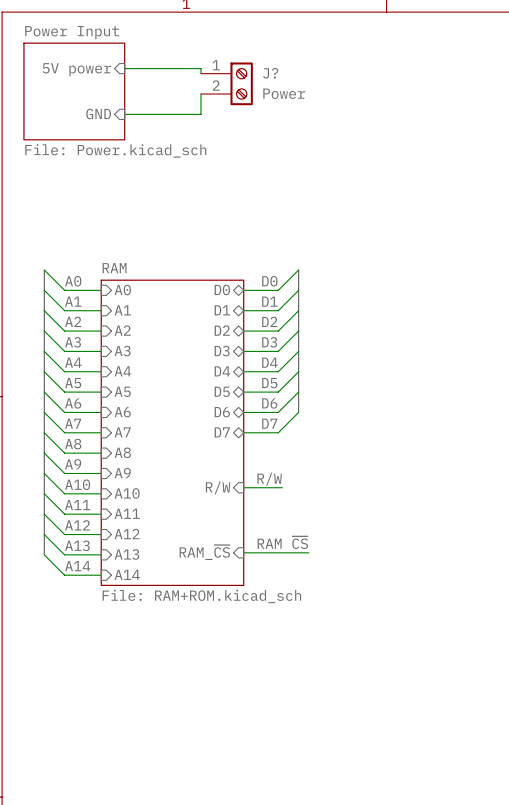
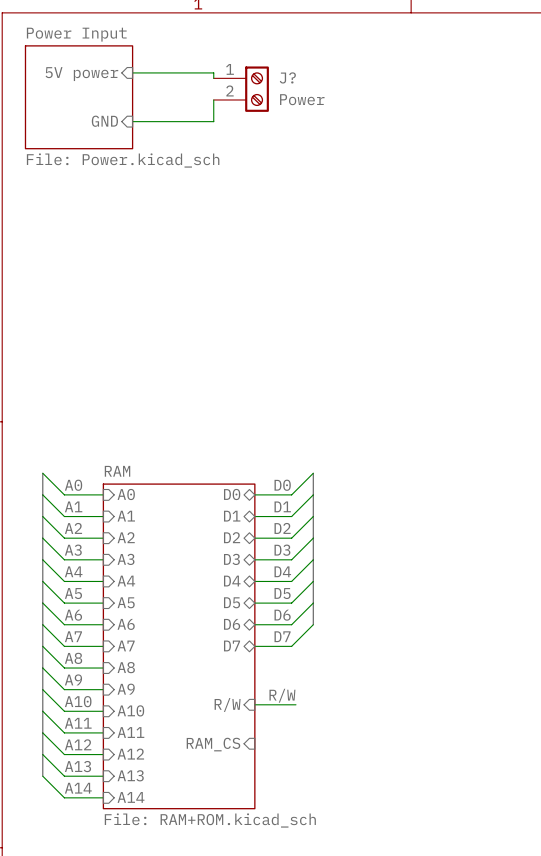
wire: (44, 270) (64, 290) (101, 290) -> (42, 473) (64, 494) (103, 494)
bus: (44, 270) (44, 554) -> (42, 473) (42, 776)
wire: (298, 270) (278, 290) (243, 290) -> (313, 473) (291, 494) (254, 494)
bus: (298, 270) (298, 412) -> (313, 473) (313, 624)
label position: A0 (73, 281) -> A0 (73, 485)
label position: D0 (269, 281) -> D0 (282, 485)
sheet pin position: A0 (122, 289) -> A0 (126, 494)
sheet pin position: D0 (222, 289) -> D0 (232, 494)
wire: (44, 290) (64, 310) (101, 310) -> (42, 494) (64, 516) (103, 516)
wire: (298, 290) (278, 310) (243, 310) -> (313, 494) (291, 516) (254, 516)
label position: A1 (73, 301) -> A1 (73, 506)
label position: D1 (269, 301) -> D1 (282, 506)
wire: (44, 310) (64, 331) (101, 331) -> (42, 516) (64, 538) (103, 538)
sheet pin position: A1 (122, 310) -> A1 (126, 516)
sheet pin position: D1 (222, 310) -> D1 (232, 516)
wire: (298, 310) (278, 331) (243, 331) -> (313, 516) (291, 538) (254, 538)
label position: A2 (73, 321) -> A2 (73, 528)
label position: D2 (269, 321) -> D2 (282, 528)
sheet pin position: A2 (122, 330) -> A2 (126, 537)
sheet pin position: D2 (222, 330) -> D2 (232, 537)
wire: (44, 331) (64, 351) (101, 351) -> (42, 538) (64, 559) (103, 559)
wire: (298, 331) (278, 351) (243, 351) -> (313, 538) (291, 559) (254, 559)
label position: A3 (73, 342) -> A3 (73, 550)
label position: D3 (269, 342) -> D3 (282, 550)
wire: (44, 351) (64, 371) (101, 371) -> (42, 559) (64, 581) (103, 581)
sheet pin position: A3 (122, 351) -> A3 (126, 559)
sheet pin position: D3 (222, 351) -> D3 (231, 559)
wire: (298, 351) (278, 371) (243, 371) -> (313, 559) (291, 581) (254, 581)
label position: A4 (73, 362) -> A4 (73, 571)
label position: D4 (269, 362) -> D4 (282, 571)
wire: (44, 371) (64, 392) (101, 392) -> (42, 581) (64, 603) (103, 603)
sheet pin position: A4 (122, 371) -> A4 (126, 581)
sheet pin position: D4 (222, 371) -> D4 (232, 581)
wire: (298, 371) (278, 392) (243, 392) -> (313, 581) (291, 603) (254, 603)
label position: A5 (73, 383) -> A5 (73, 593)
label position: D5 (269, 383) -> D5 (282, 593)
sheet pin position: A5 (122, 391) -> A5 (126, 602)
sheet pin position: D5 (222, 391) -> D5 (232, 602)
wire: (44, 392) (64, 412) (101, 412) -> (42, 603) (64, 624) (103, 624)
wire: (298, 392) (278, 412) (243, 412) -> (313, 603) (291, 624) (254, 624)
label position: A6 (73, 403) -> A6 (73, 615)
label position: D6 (269, 403) -> D6 (282, 615)
wire: (44, 412) (64, 432) (101, 432) -> (42, 624) (64, 646) (103, 646)
sheet pin position: A6 (122, 412) -> A6 (126, 624)
sheet pin position: D6 (222, 412) -> D6 (232, 624)
wire: (298, 412) (278, 432) (243, 432) -> (313, 624) (291, 646) (254, 646)
label position: A7 (73, 423) -> A7 (73, 636)
label position: D7 (269, 423) -> D7 (282, 636)
wire: (44, 432) (64, 453) (101, 453) -> (42, 646) (64, 668) (103, 668)
sheet pin position: A7 (122, 432) -> A7 (126, 645)
sheet RAM position: (172, 432) -> (179, 646)
sheet pin position: D7 (222, 432) -> D7 (232, 645)
label position: A8 (73, 444) -> A8 (73, 658)
sheet pin position: A8 (122, 452) -> A8 (126, 667)
wire: (44, 453) (64, 473) (101, 473) -> (42, 668) (64, 689) (103, 689)
label position: A9 (73, 464) -> A9 (73, 679)
wire: (44, 473) (64, 493) (101, 493) -> (42, 689) (64, 711) (103, 711)
sheet pin position: A9 (122, 473) -> A9 (126, 689)
label position: R/W (269, 479) -> R/W (282, 695)
label position: A10 (77, 484) -> A10 (78, 701)
sheet pin position: R/W (218, 487) -> R/W (227, 704)
wire: (243, 487) (282, 487) -> (254, 704) (295, 704)
wire: (44, 493) (64, 514) (101, 514) -> (42, 711) (64, 732) (103, 732)
sheet pin position: A10 (127, 493) -> A10 (130, 710)
label position: A11 (77, 505) -> A11 (78, 723)
sheet pin position: A11 (127, 513) -> A11 (130, 732)
wire: (44, 514) (64, 534) (101, 534) -> (42, 732) (64, 754) (103, 754)
label position: A12 (77, 525) -> A12 (78, 744)
wire: (44, 534) (64, 554) (101, 554) -> (42, 754) (64, 776) (103, 776)
sheet pin position: A12 (127, 534) -> A12 (130, 754)
label: RAM ~{CS} (282, 542) -> none
label position: A13 (77, 545) -> A13 (77, 766)
sheet pin: RAM_~{CS} (204, 552) -> none
wire: (243, 552) (308, 552) -> none
wire: (44, 554) (64, 575) (101, 575) -> (42, 776) (64, 797) (103, 797)
sheet pin position: A13 (126, 554) -> A13 (130, 775)
label position: A14 (77, 566) -> A14 (78, 788)
sheet pin position: A14 (127, 574) -> A14 (131, 797)
sheet pin: none -> RAM_CS (213, 744)

